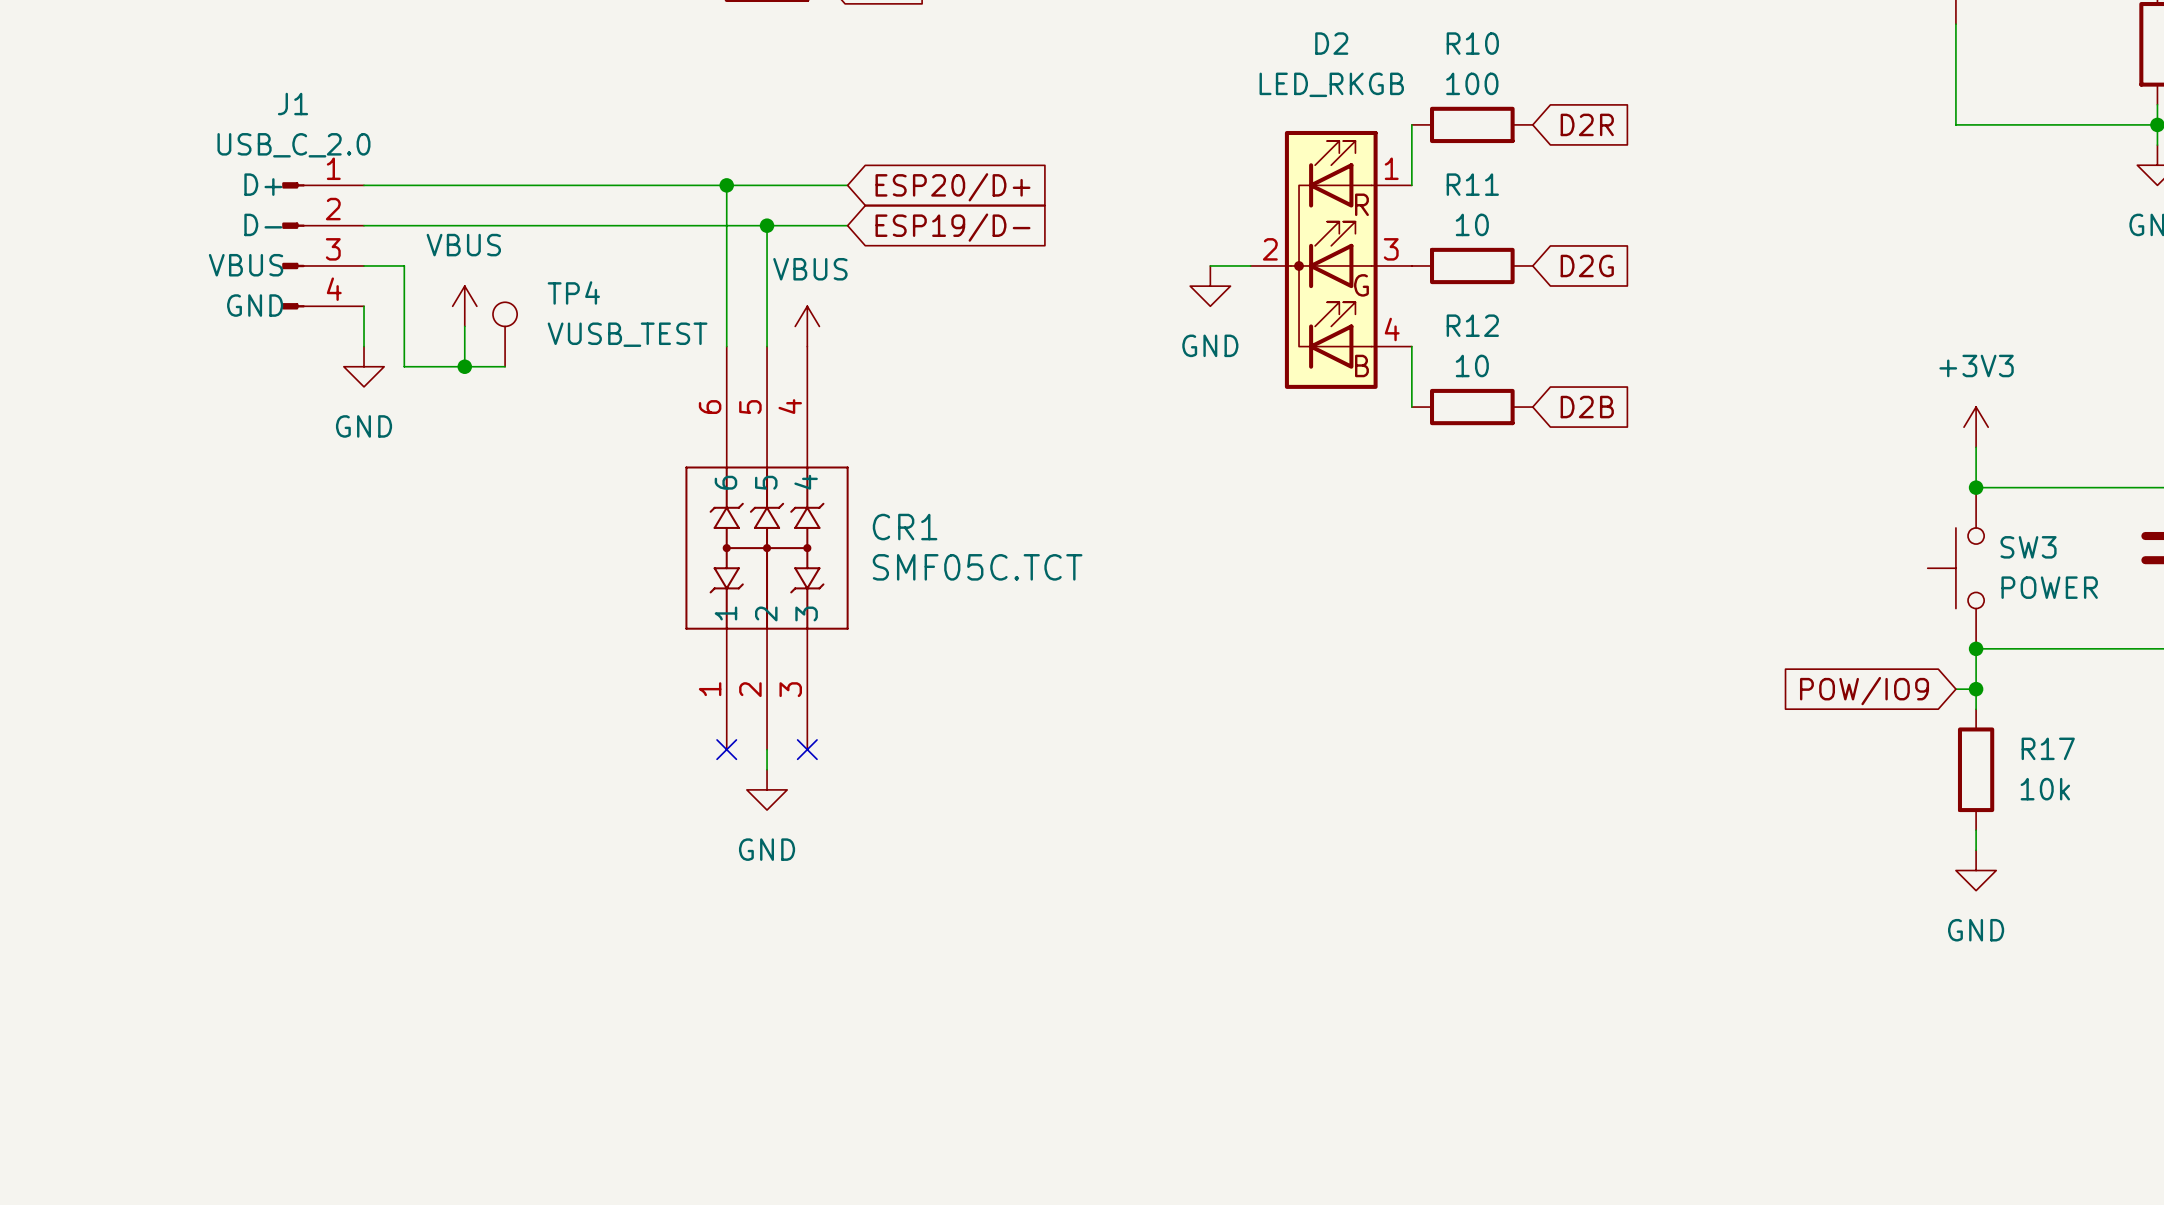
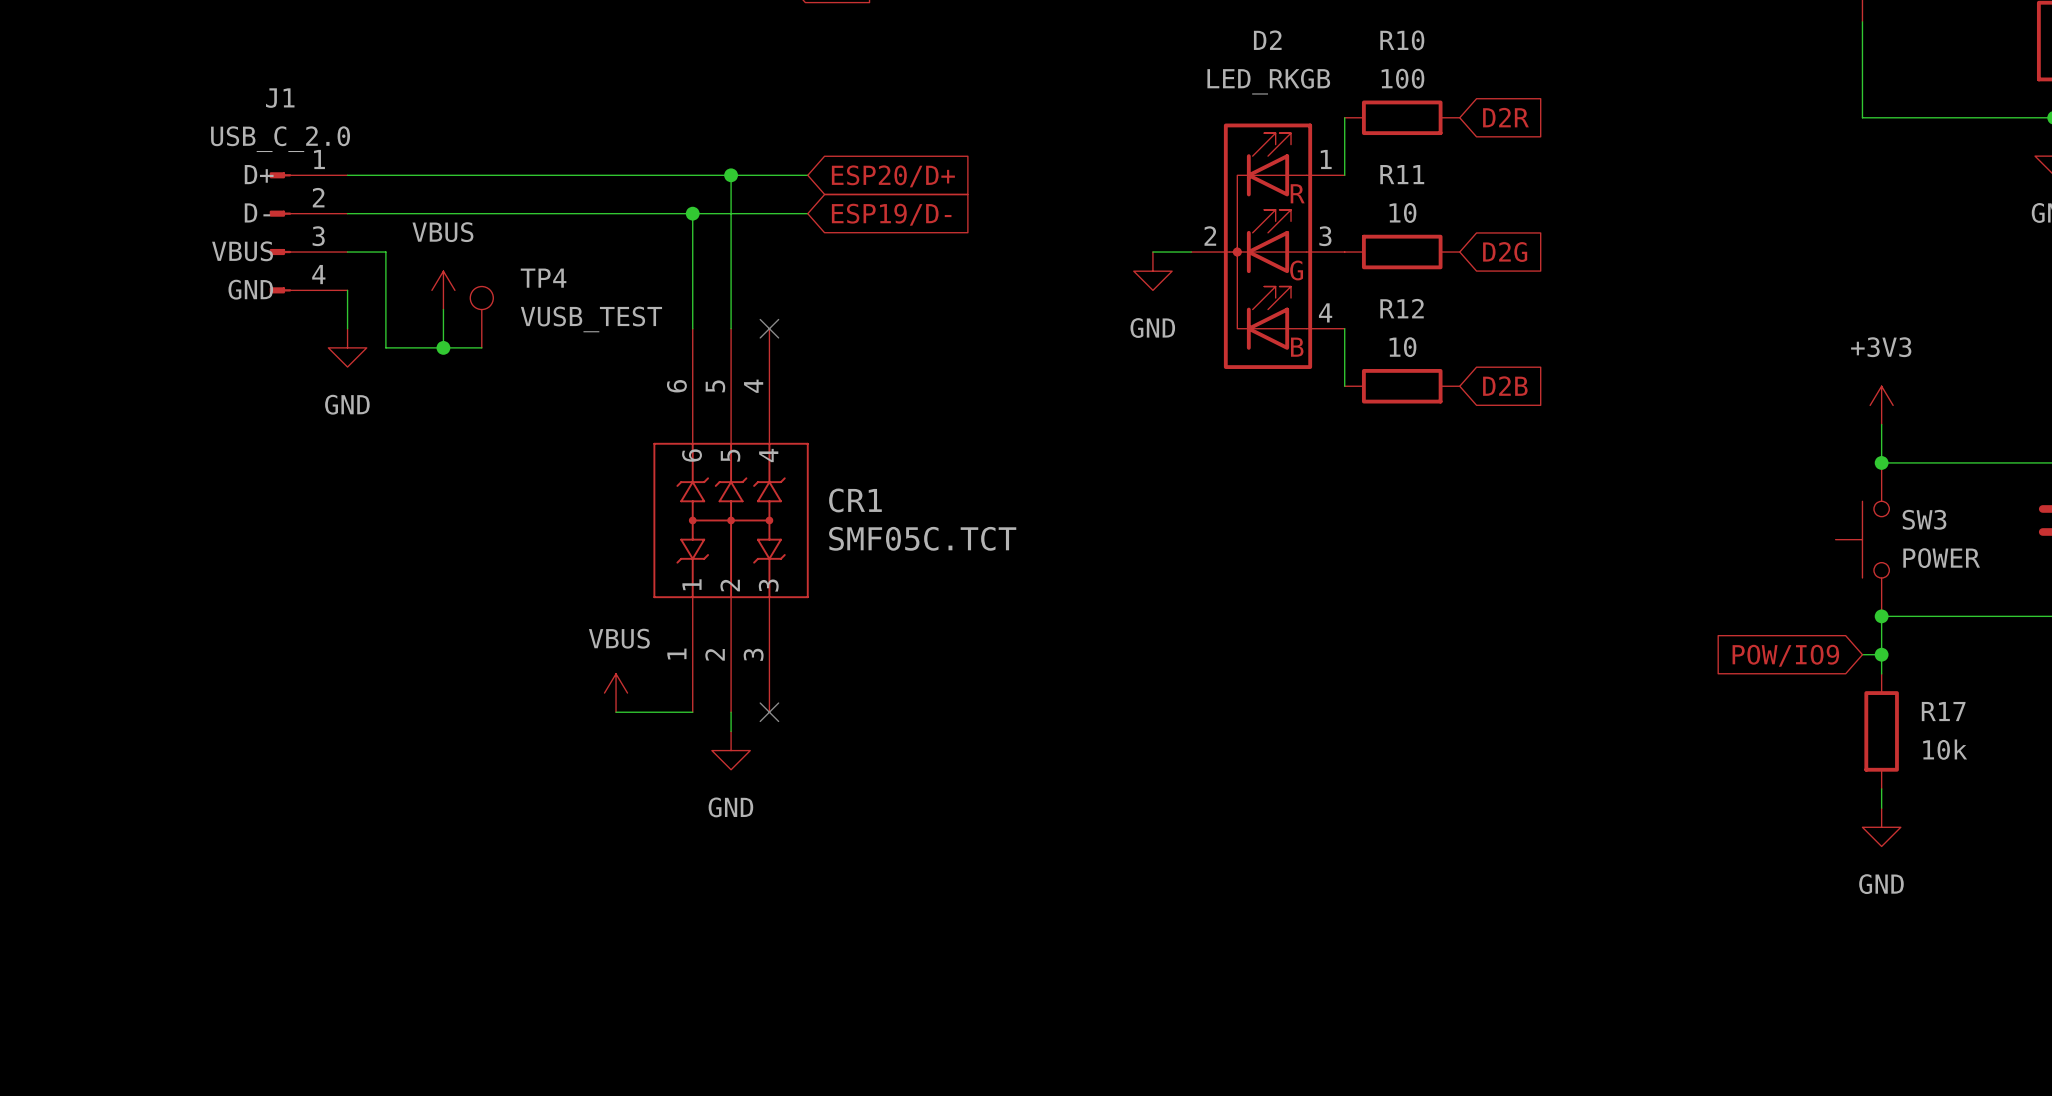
wire: (726, 185) (726, 225) -> (731, 175) (731, 213)
junction: (726, 185) -> none
junction: none -> (731, 175)
junction: none -> (692, 213)
junction: (767, 225) -> none
power symbol: VBUS (807, 326) -> none
no-connect mark: none -> (769, 328)
power symbol: none -> VBUS (616, 693)
wire: none -> (616, 712) (692, 712)
no-connect mark: (726, 749) -> none

